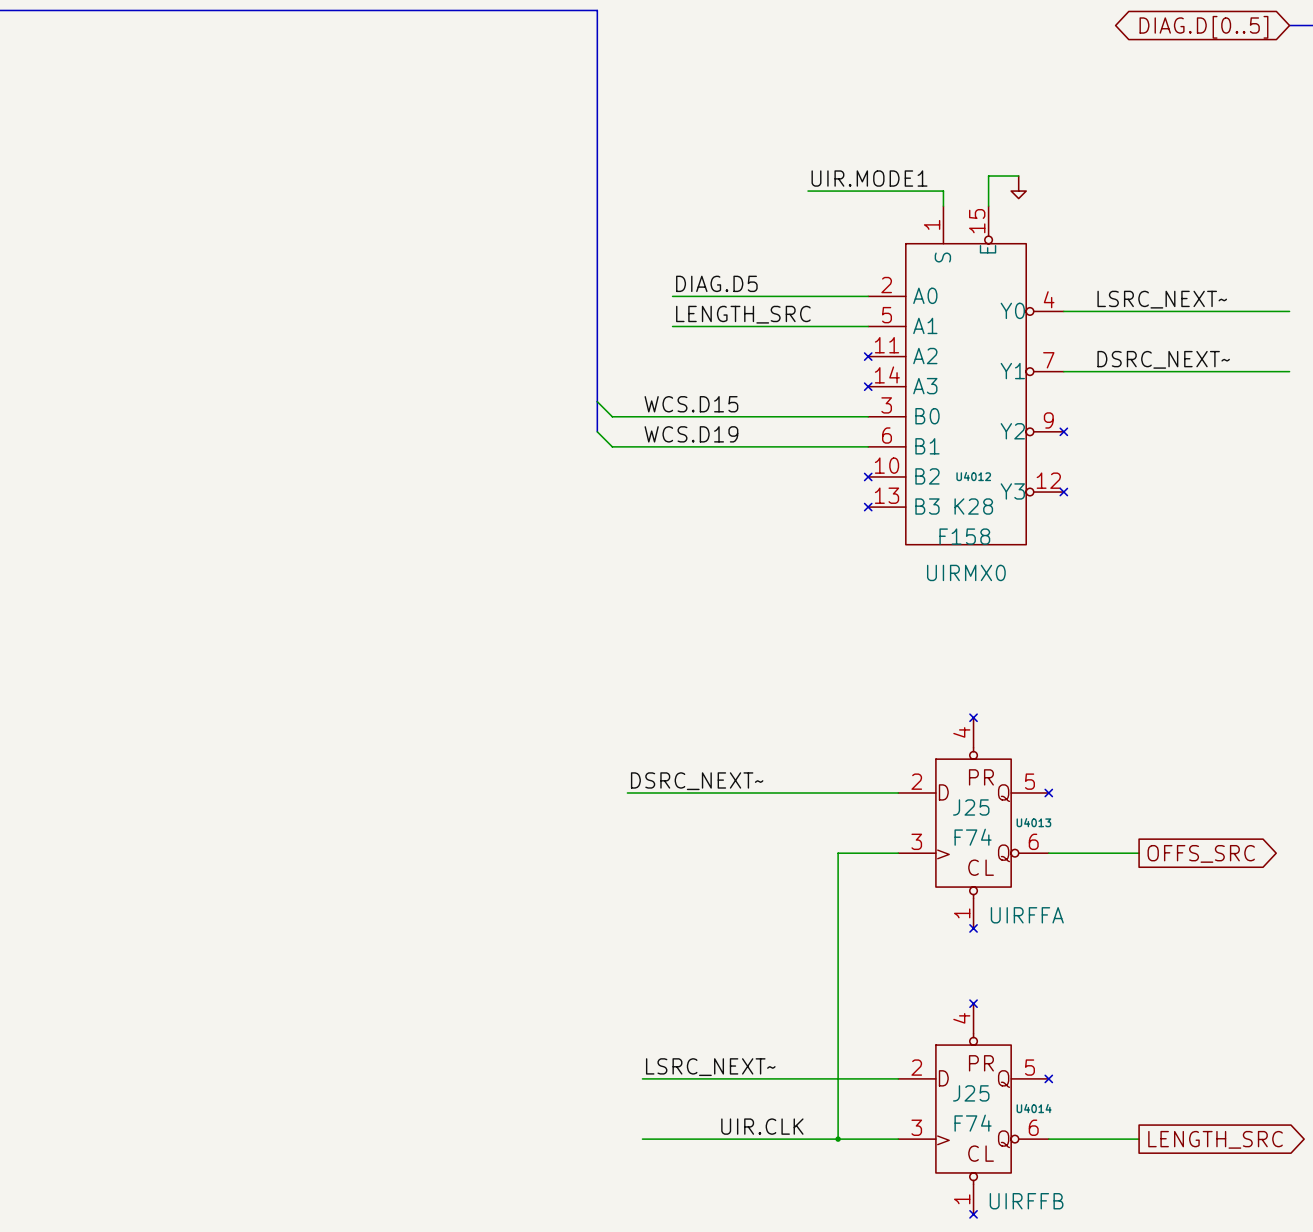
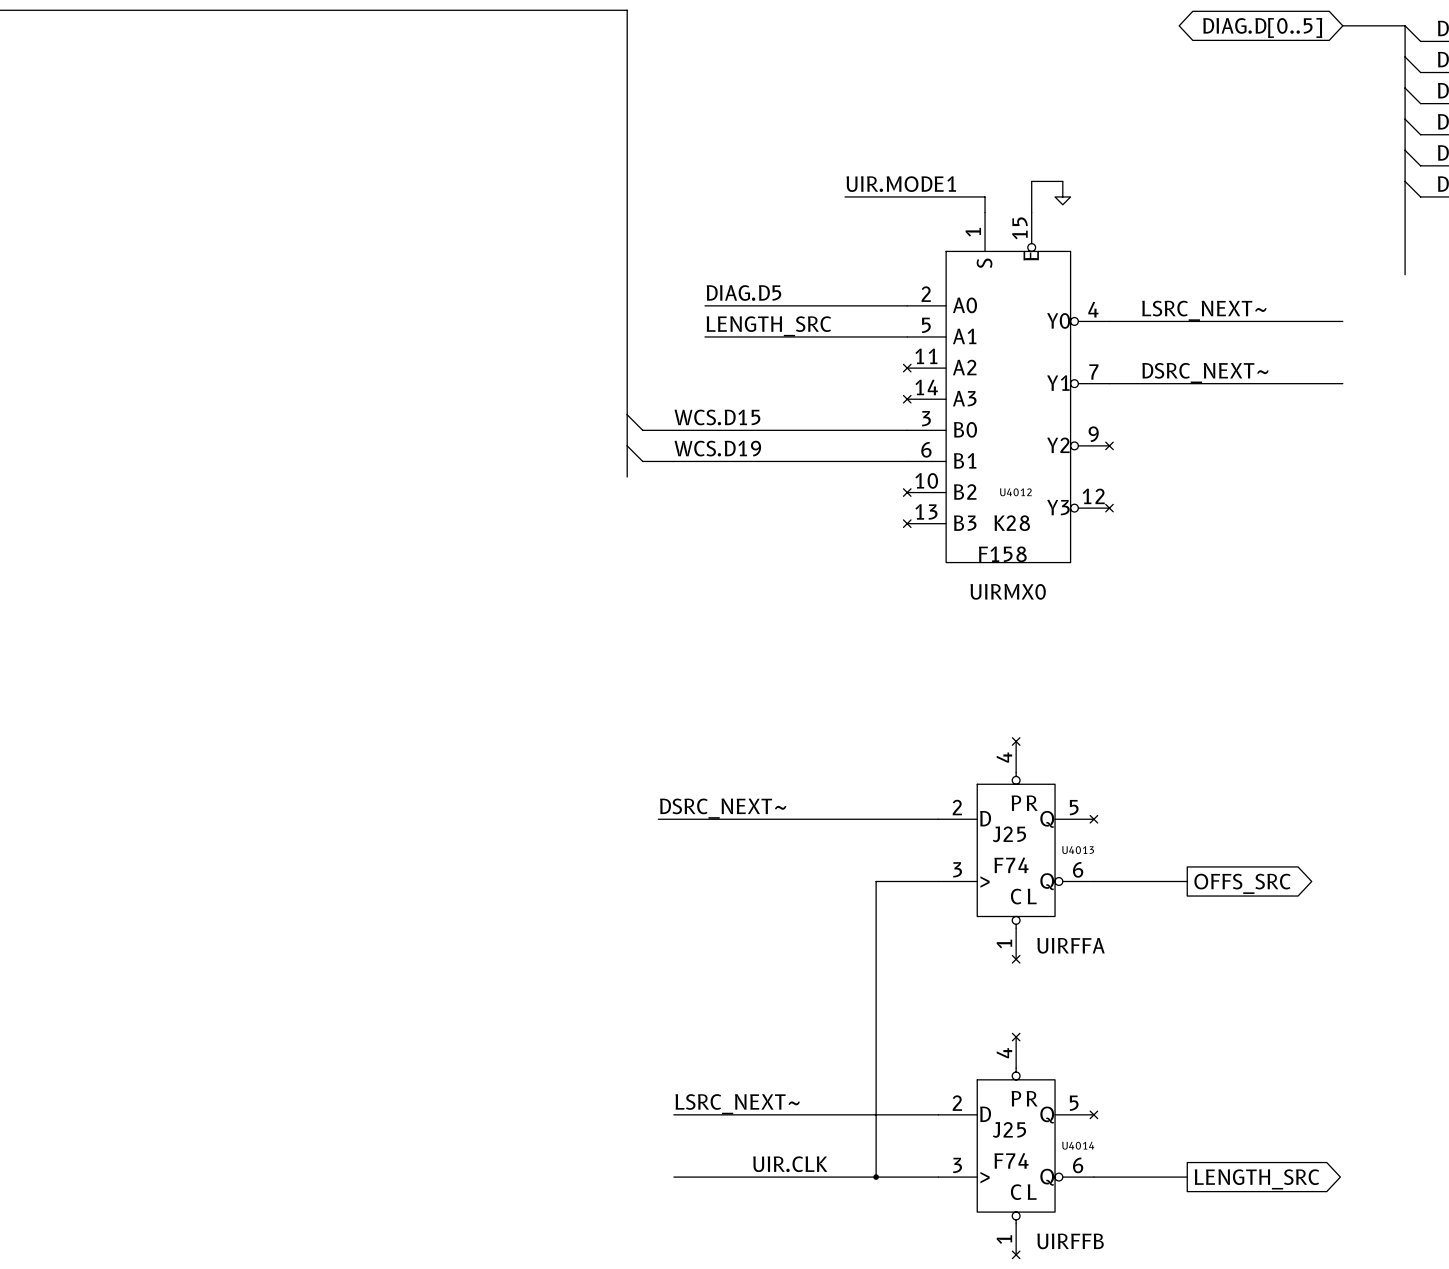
bus: none -> (627, 445) (627, 477)

